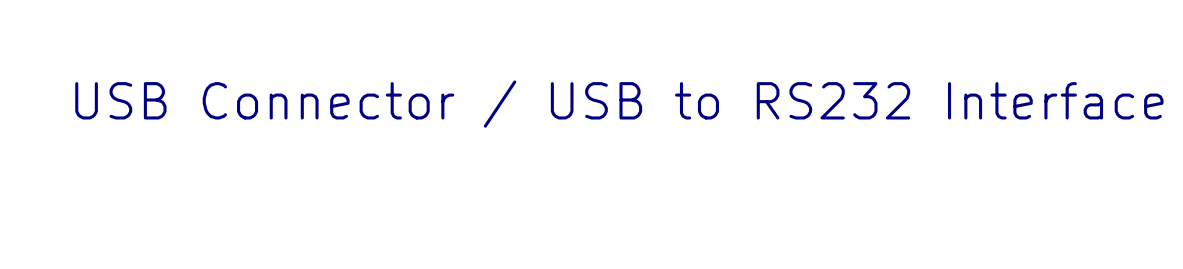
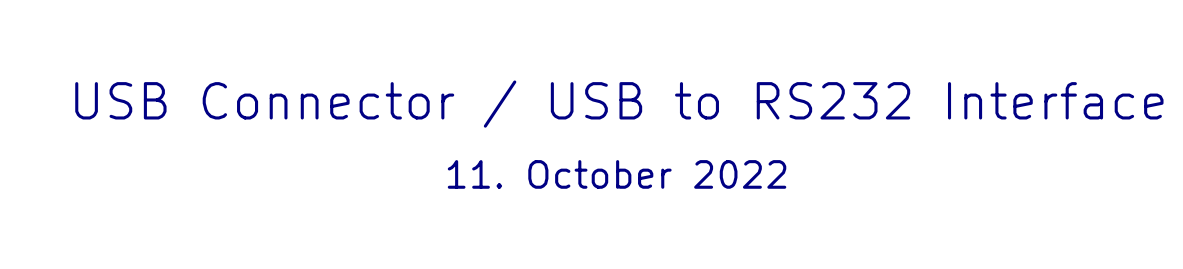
text: none -> 11. October 2022 (617, 174)

